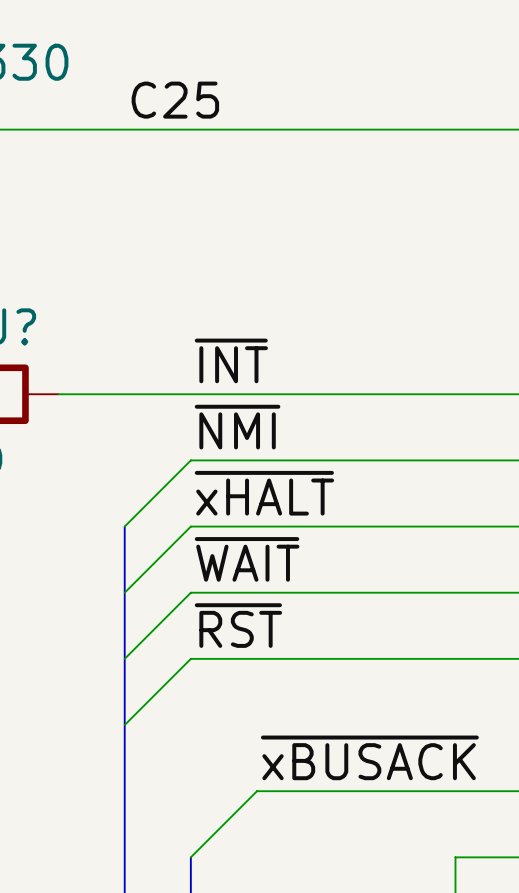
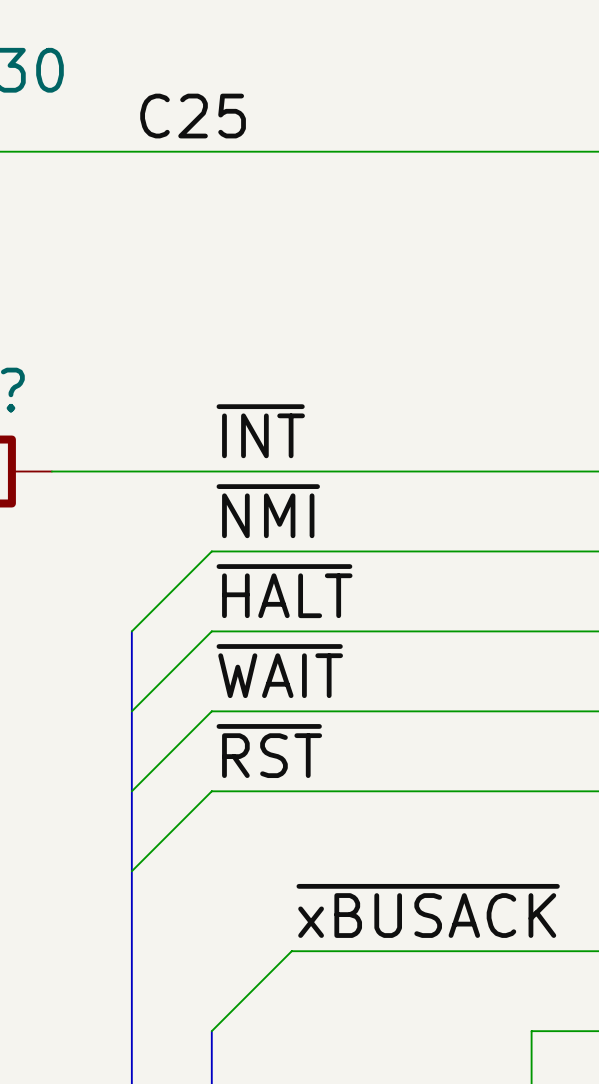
label: ~{xHALT} (264, 493) -> ~{HALT} (284, 591)

